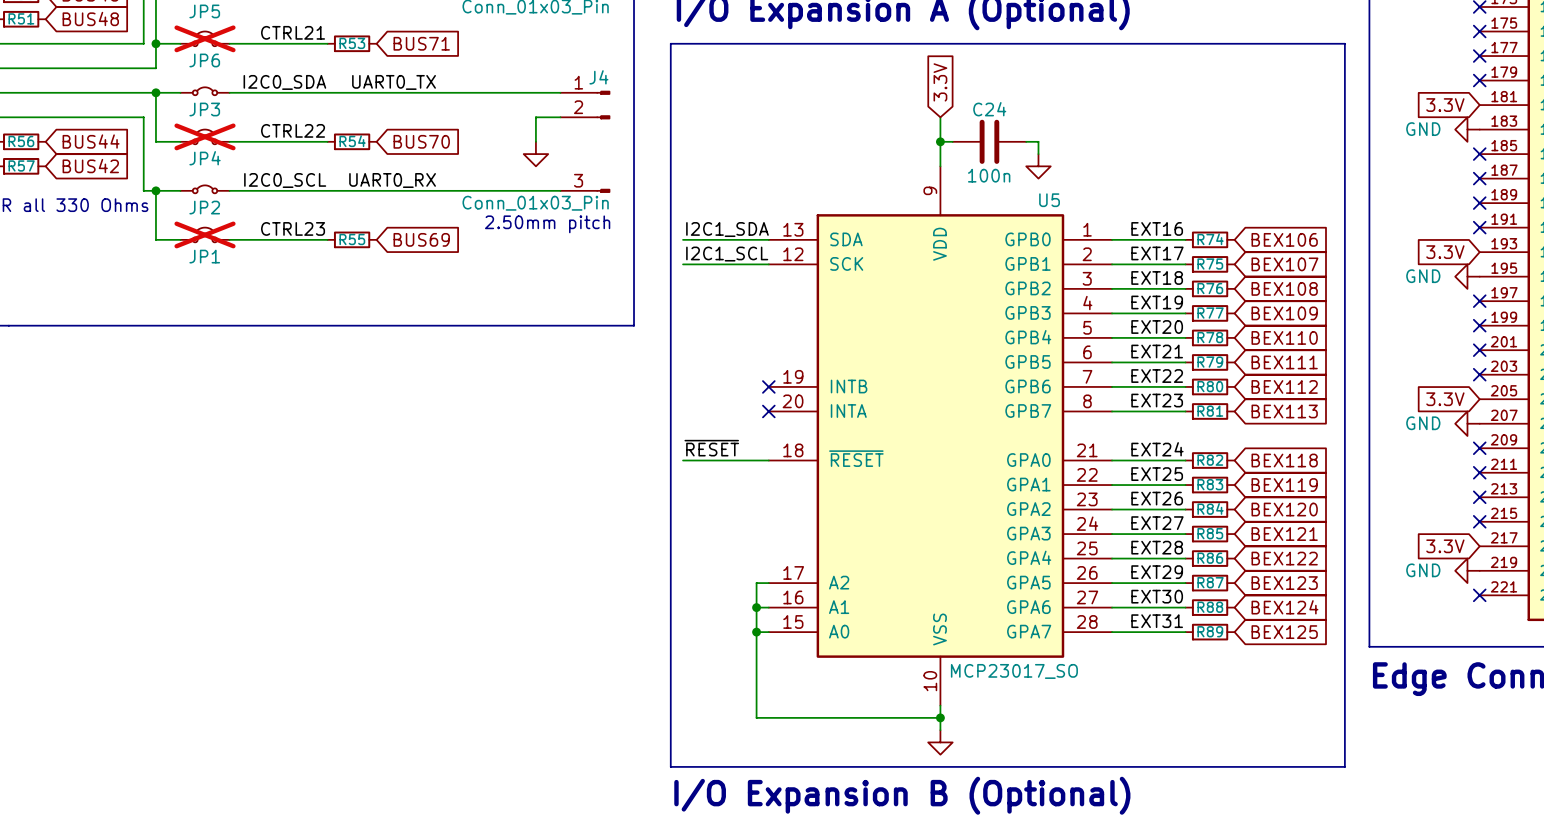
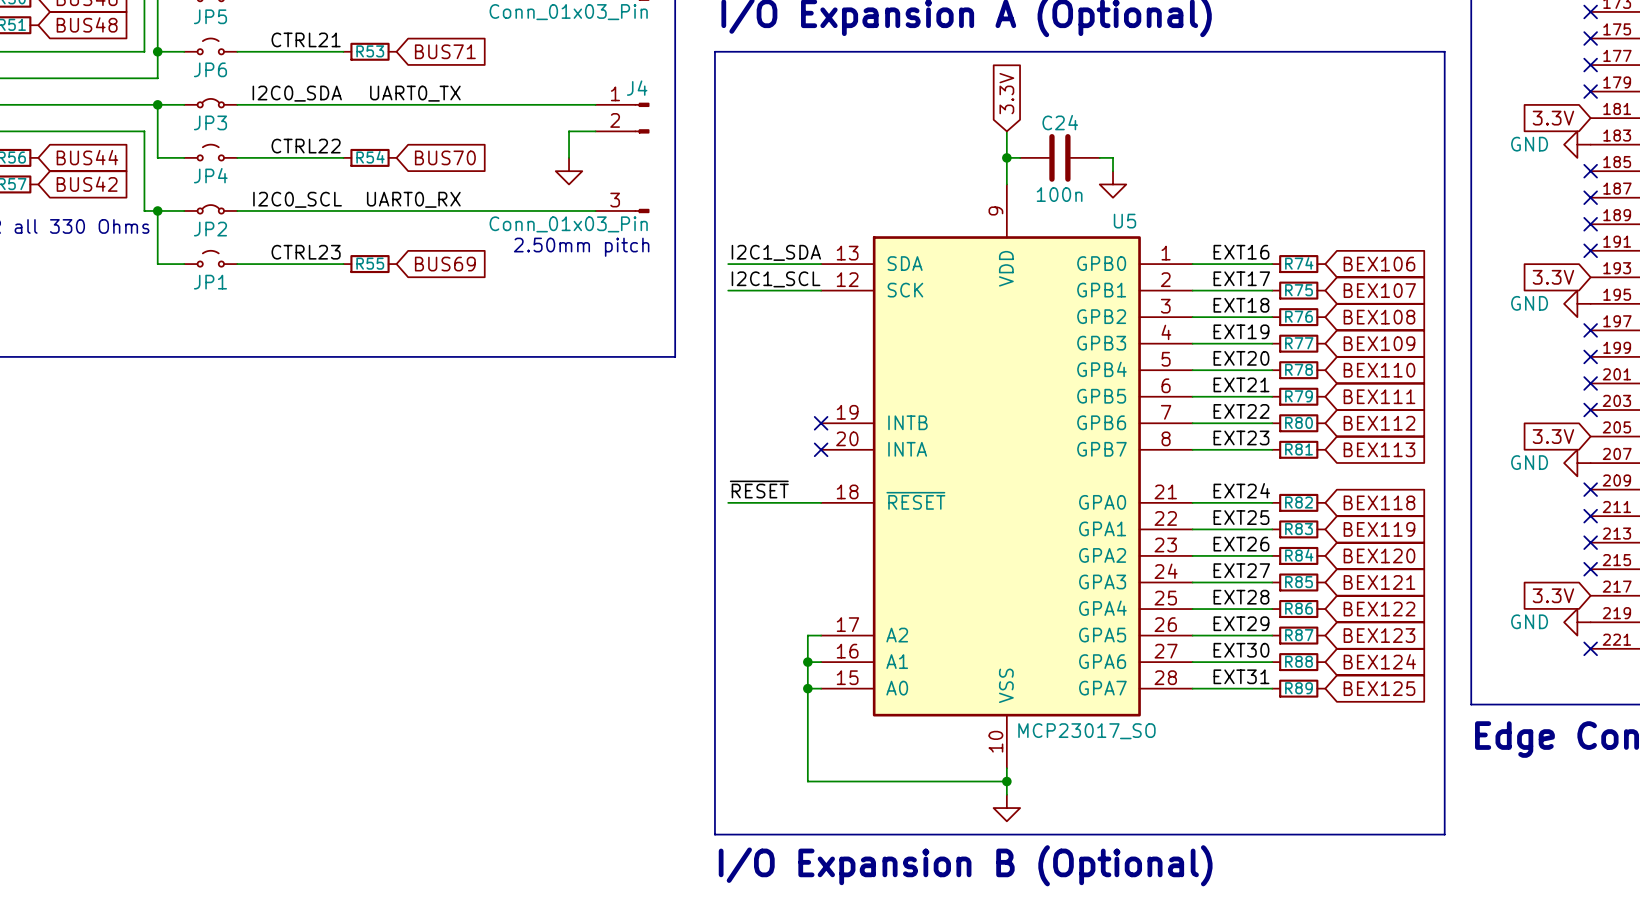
JP6 do-not-place cross: (205, 38) -> none
JP4 do-not-place cross: (205, 136) -> none
JP1 do-not-place cross: (205, 234) -> none

